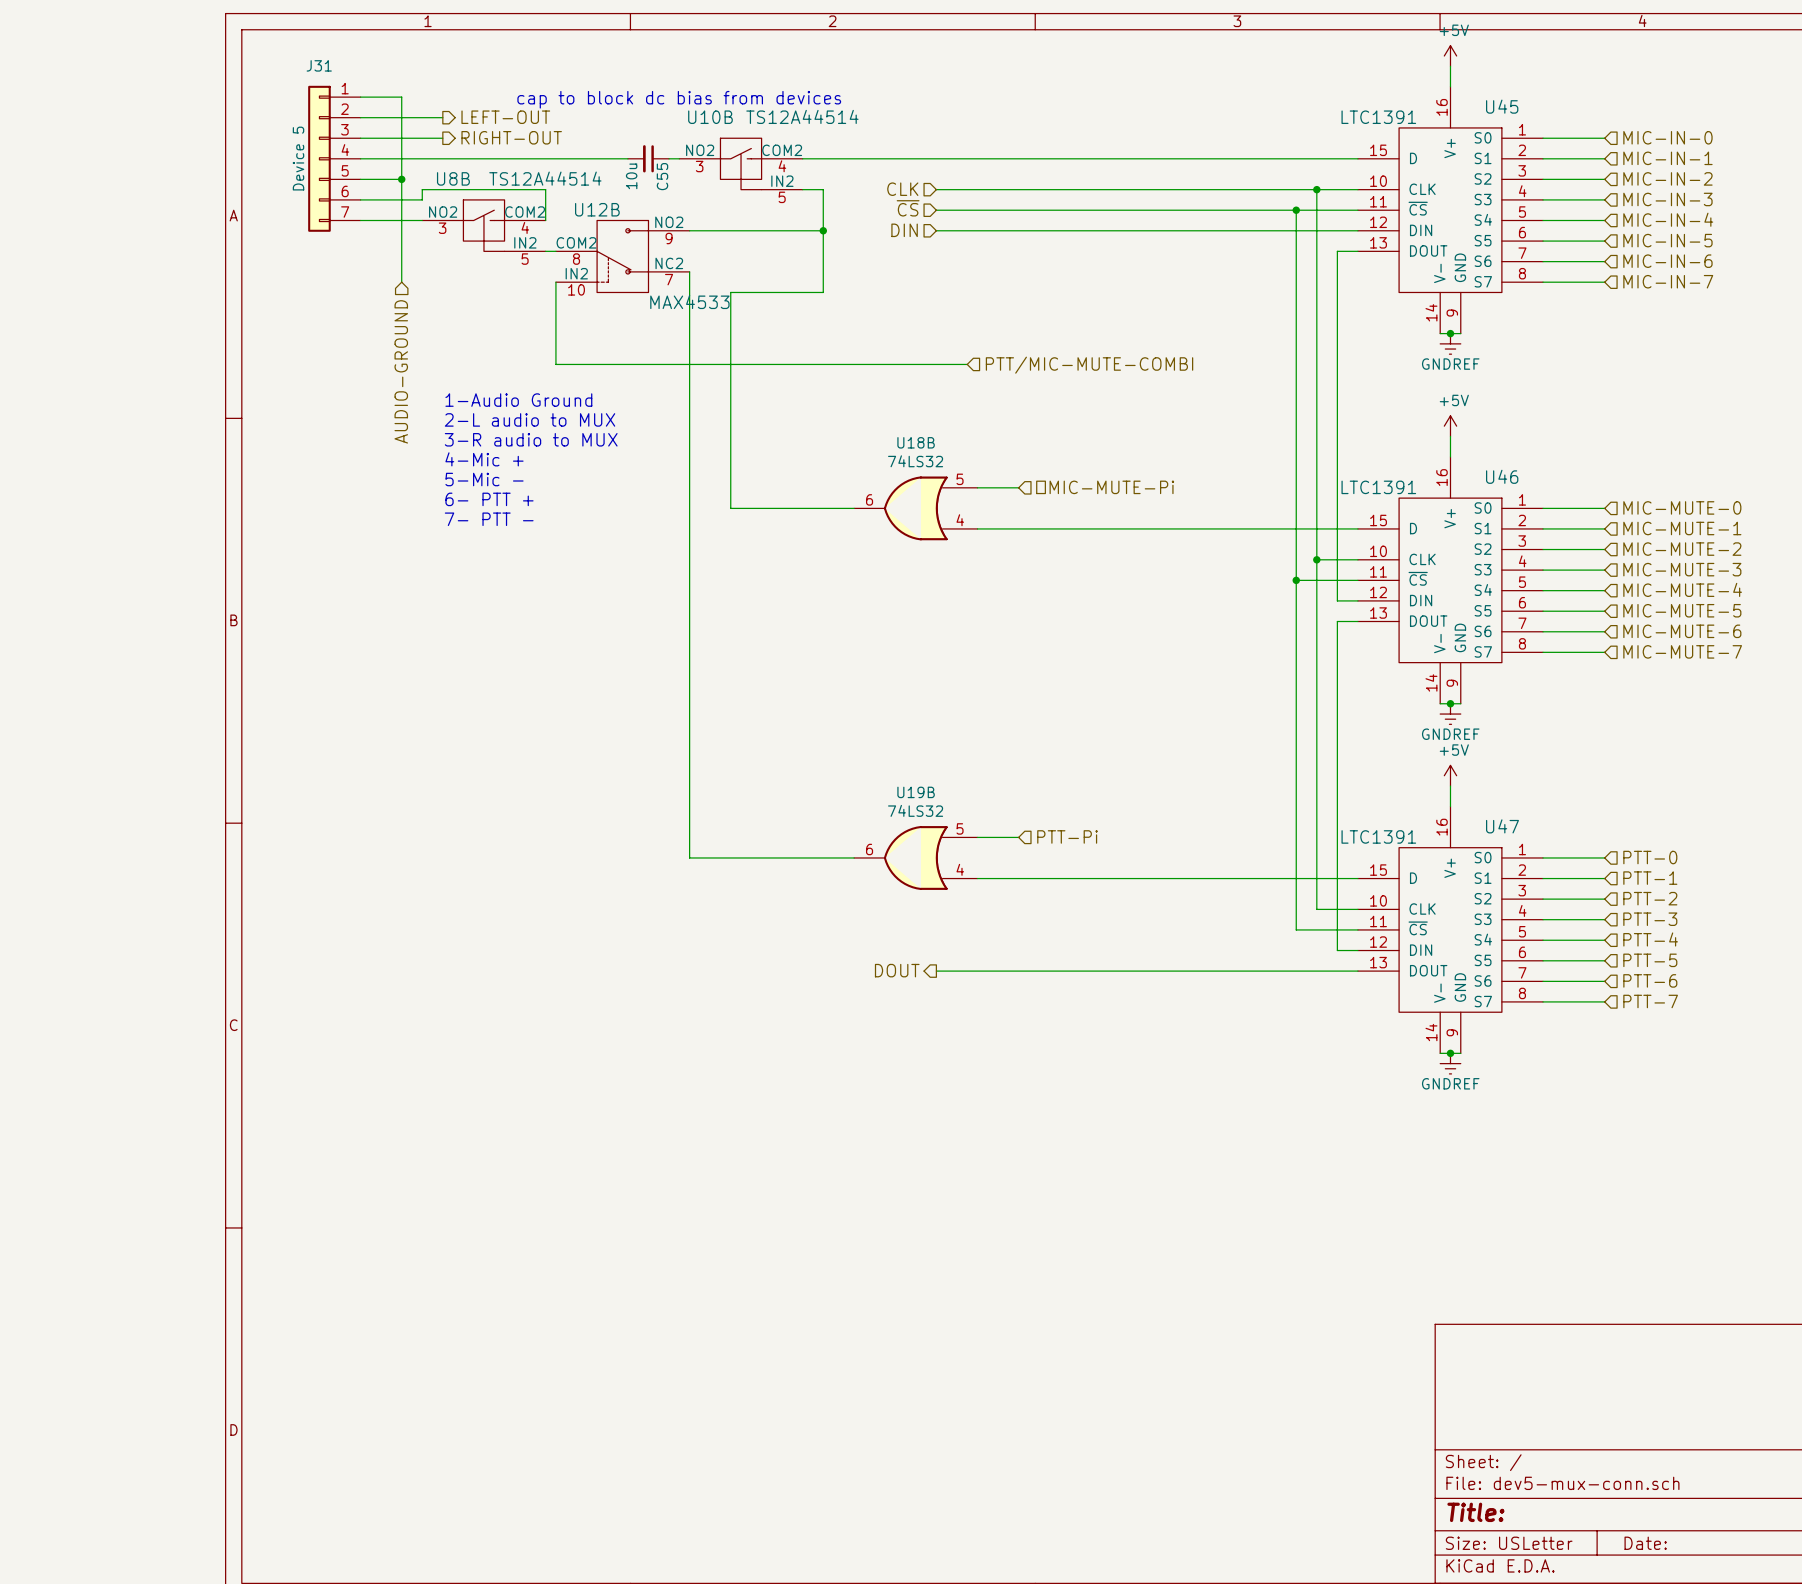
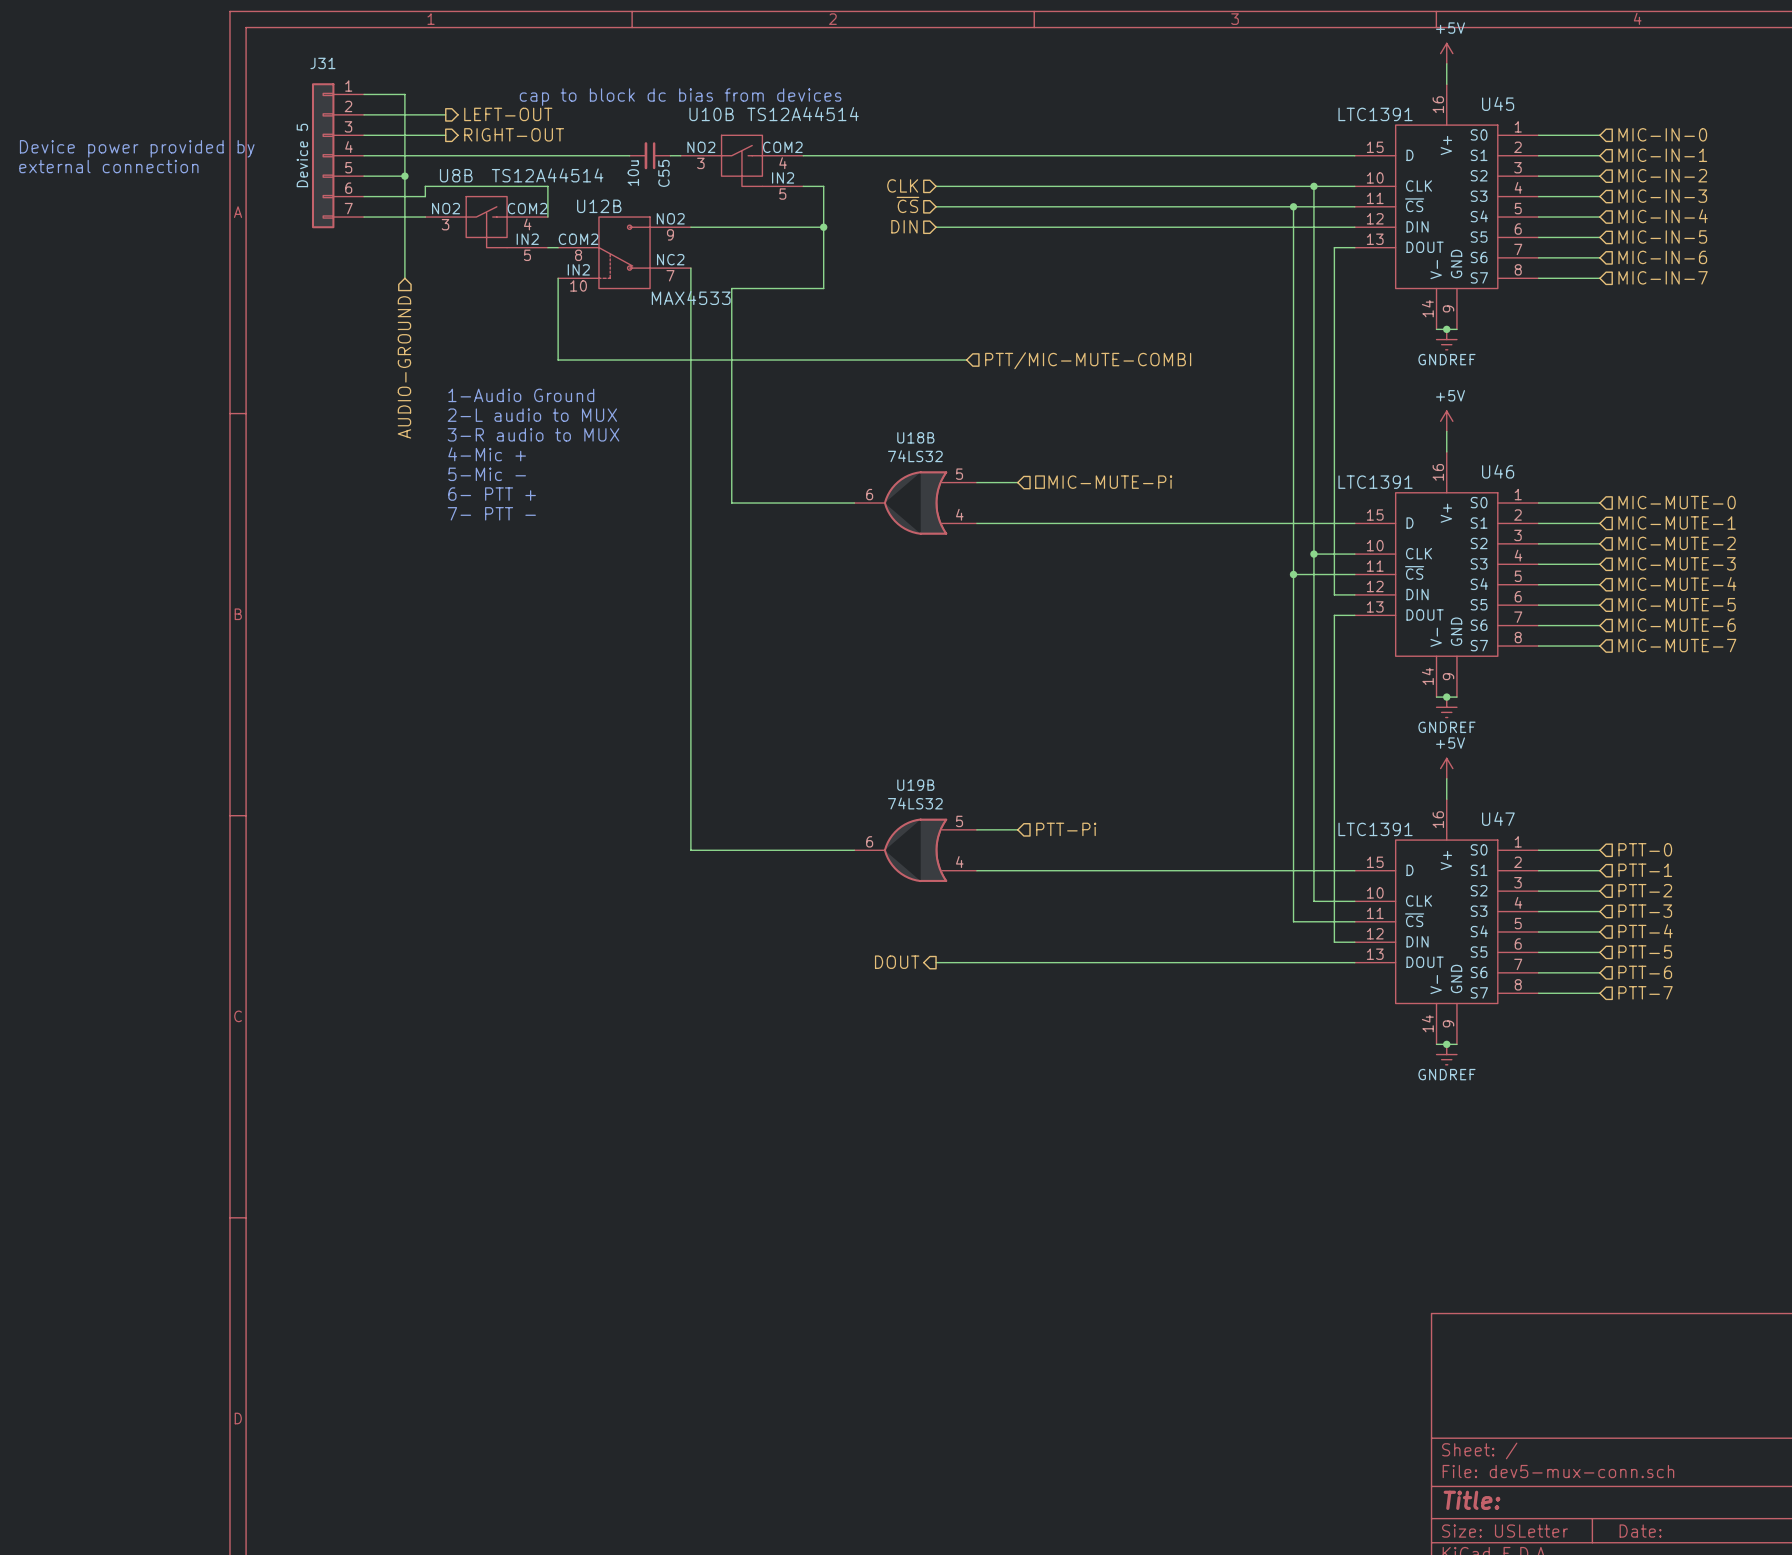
text: none -> Device power provided by (137, 148)
text: none -> external connection (108, 166)

